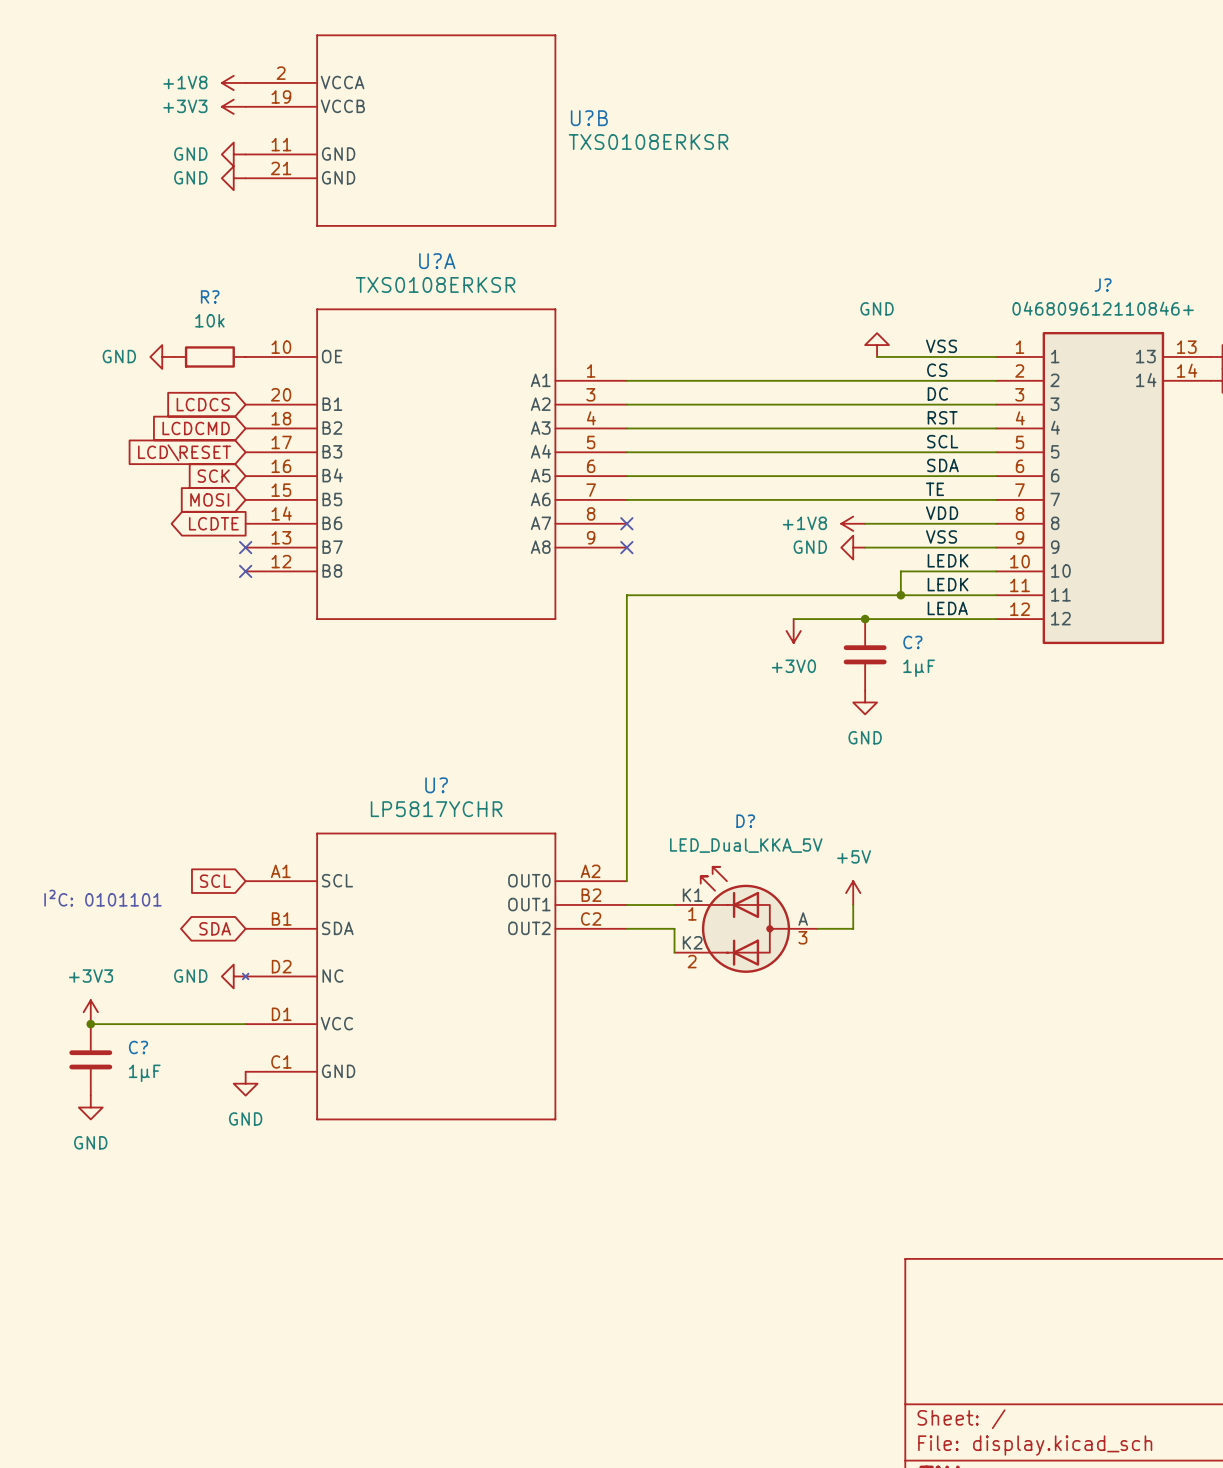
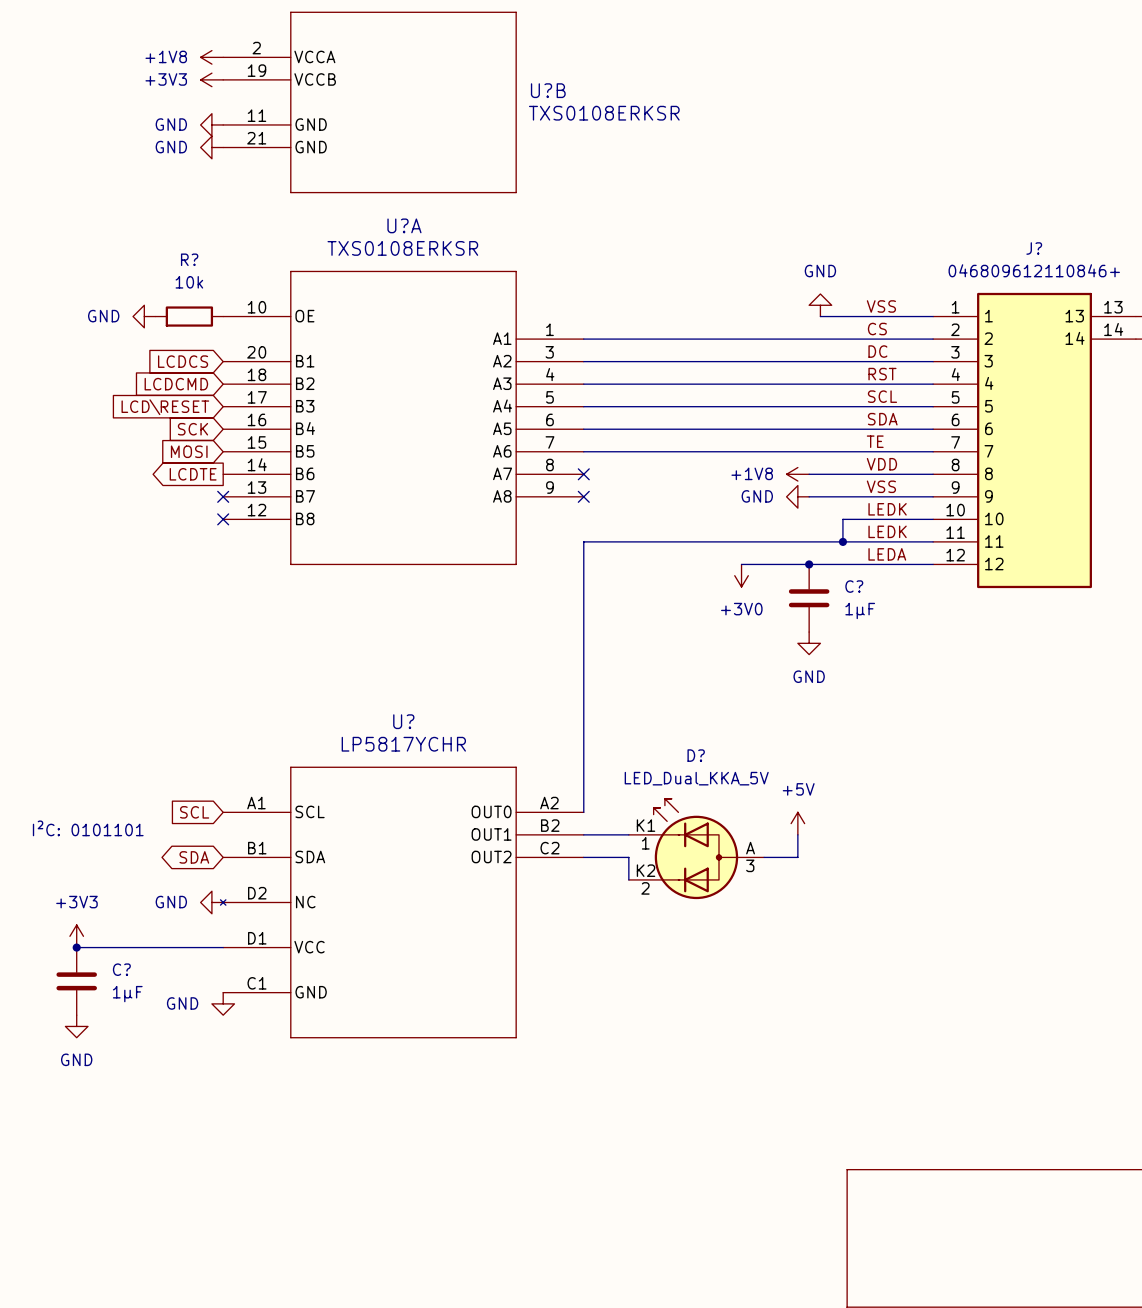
power symbol text position: GND (245, 1118) -> GND (182, 1003)

